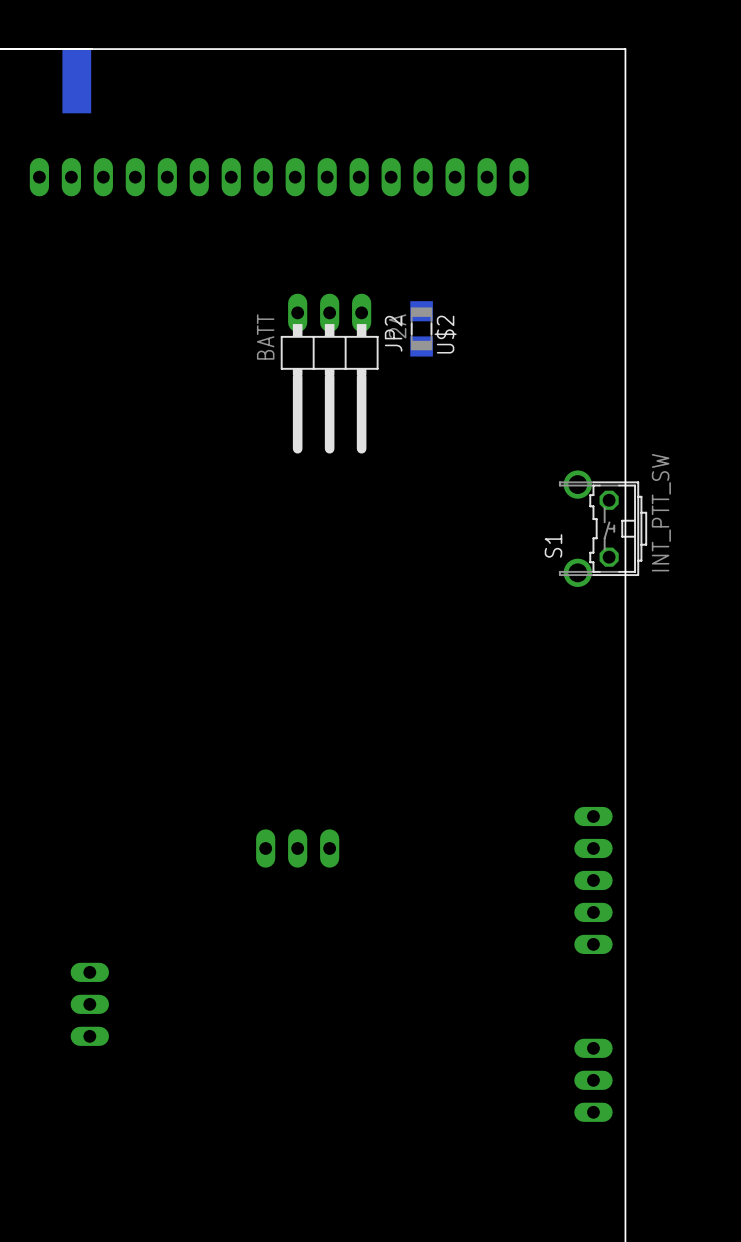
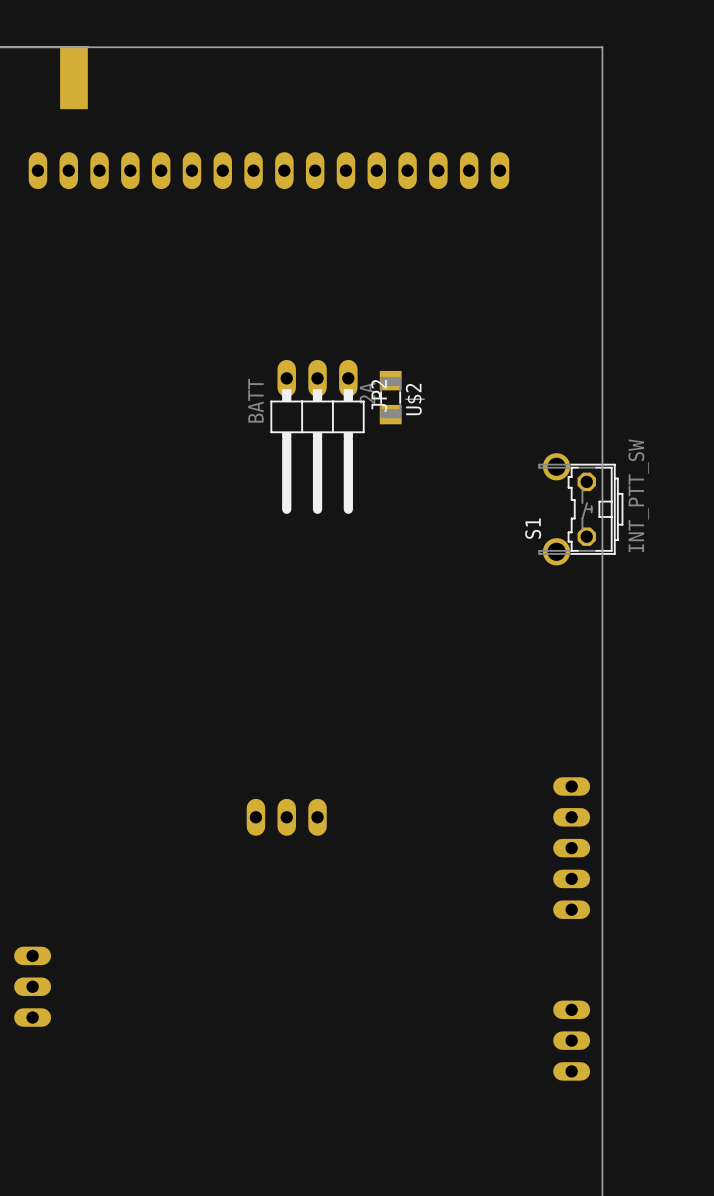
U$2 position: (421, 328) -> (390, 397)
JP2 position: (329, 373) -> (317, 436)
part position: (89, 1004) -> (32, 986)

